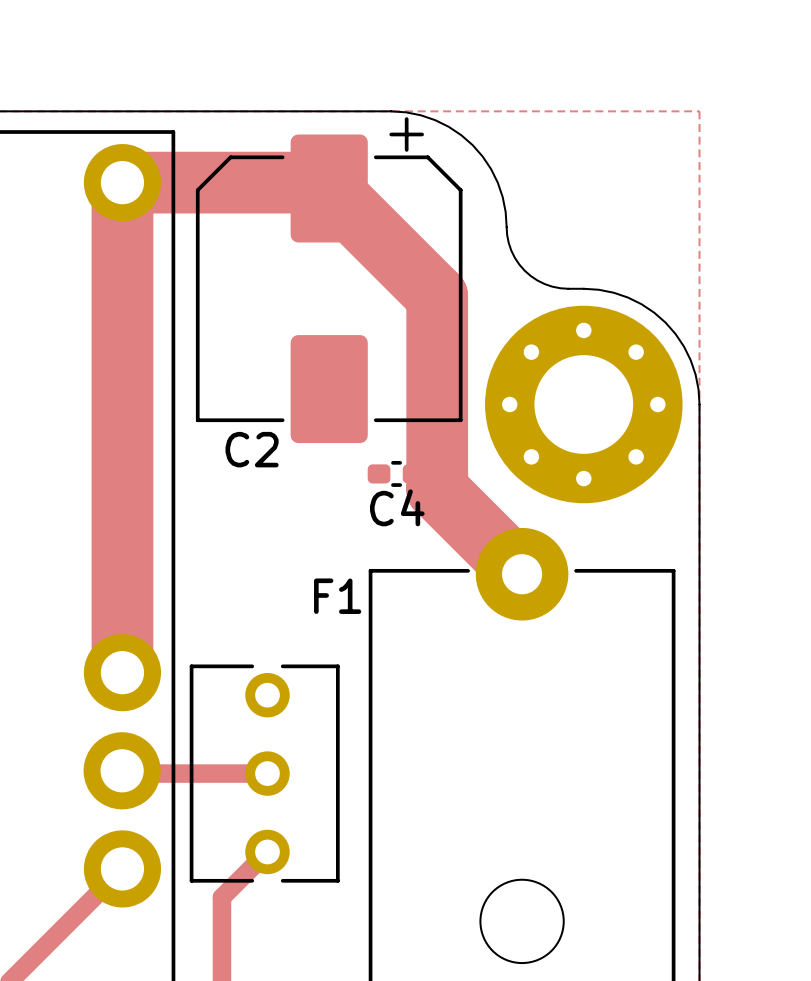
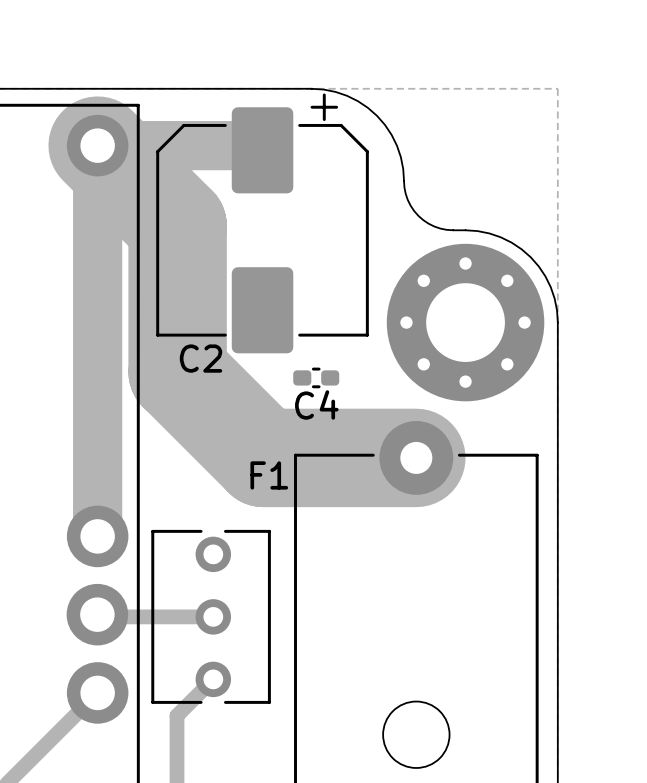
track: (329, 188) (437, 296) (437, 489) (522, 574) -> (97, 145) (177, 225) (177, 372) (263, 457) (416, 457)

